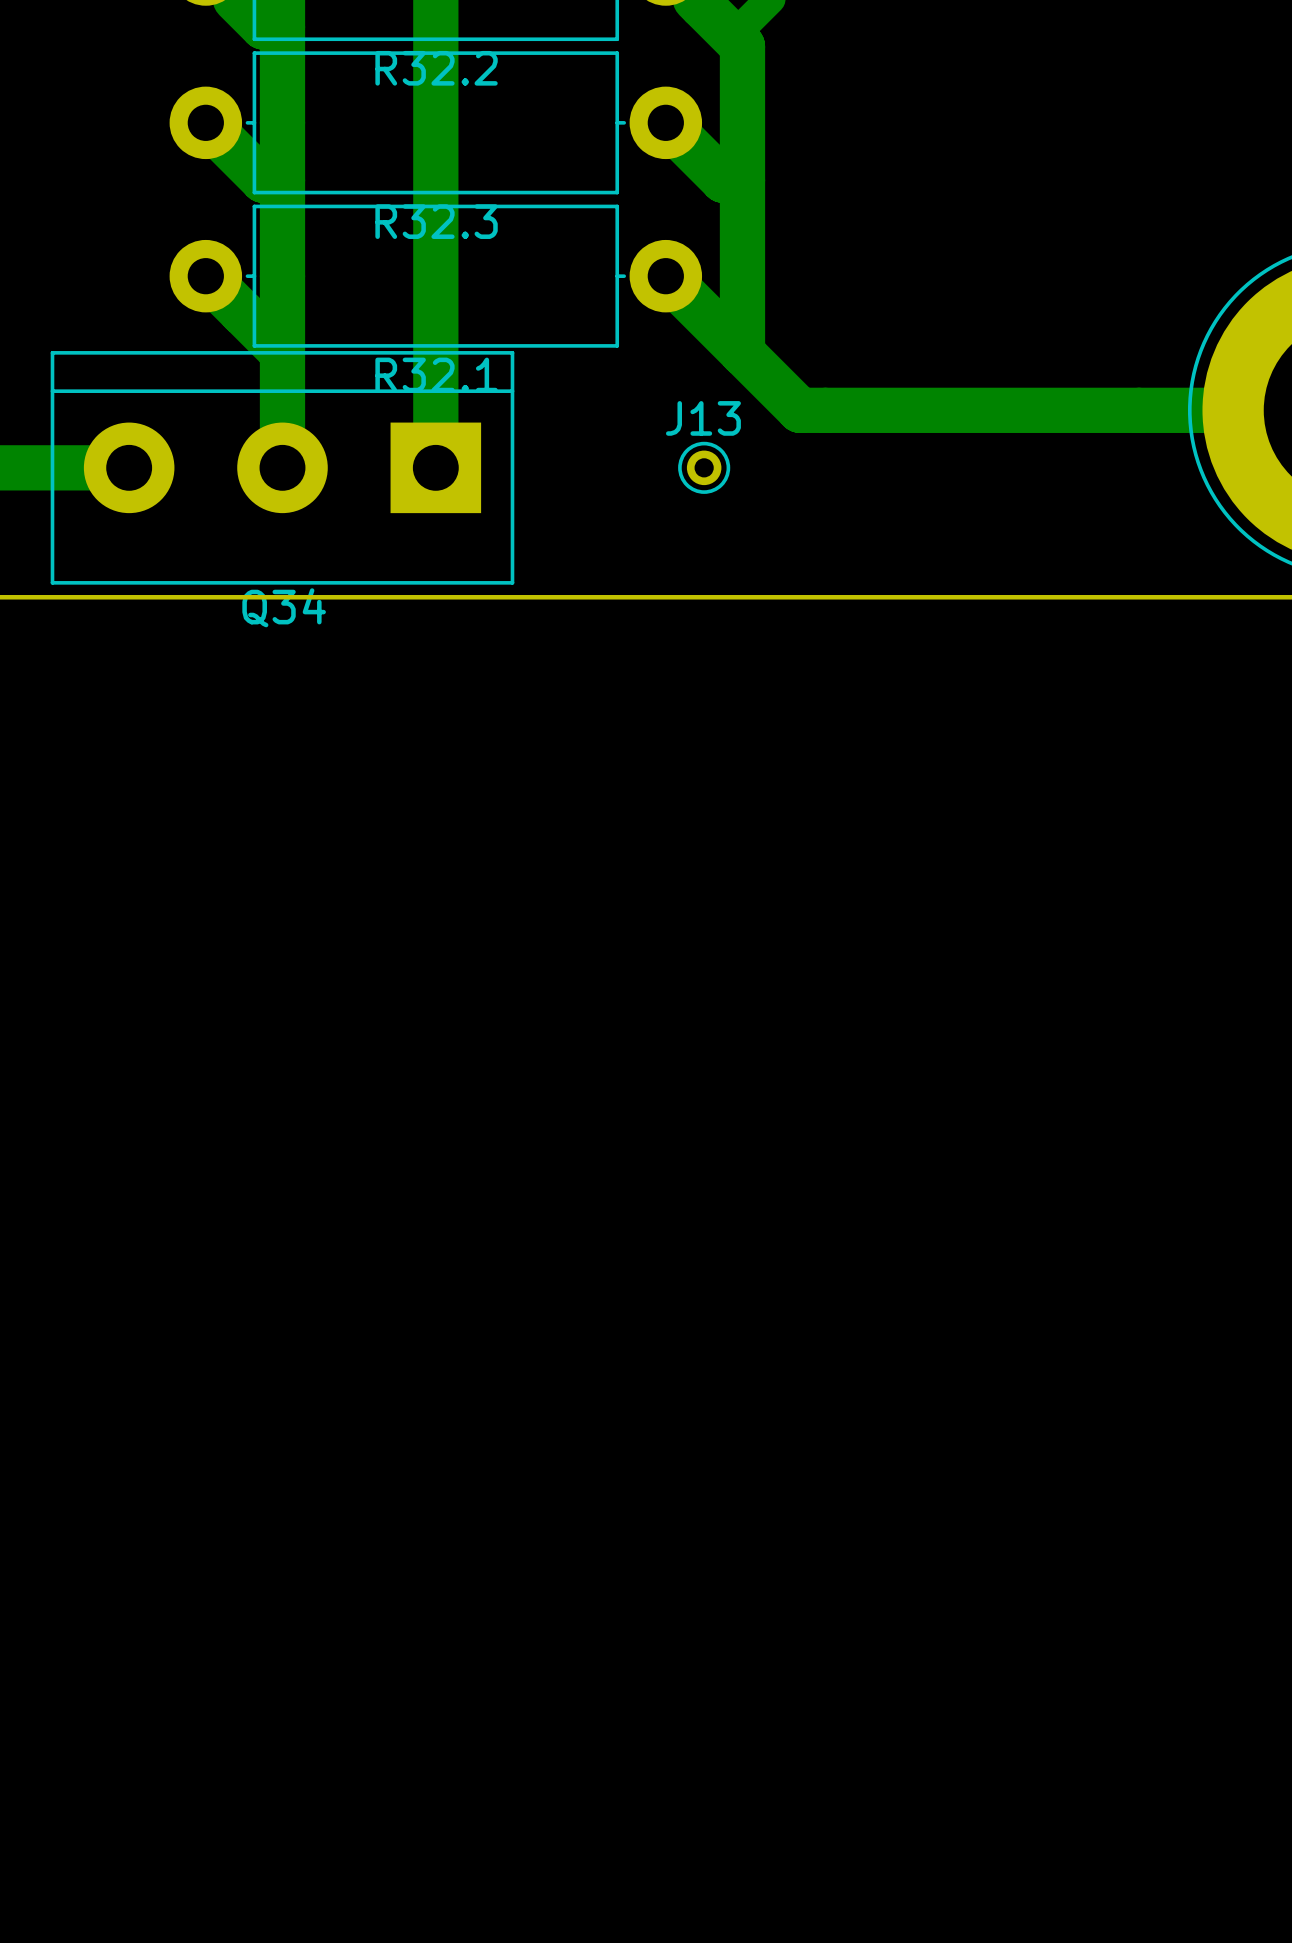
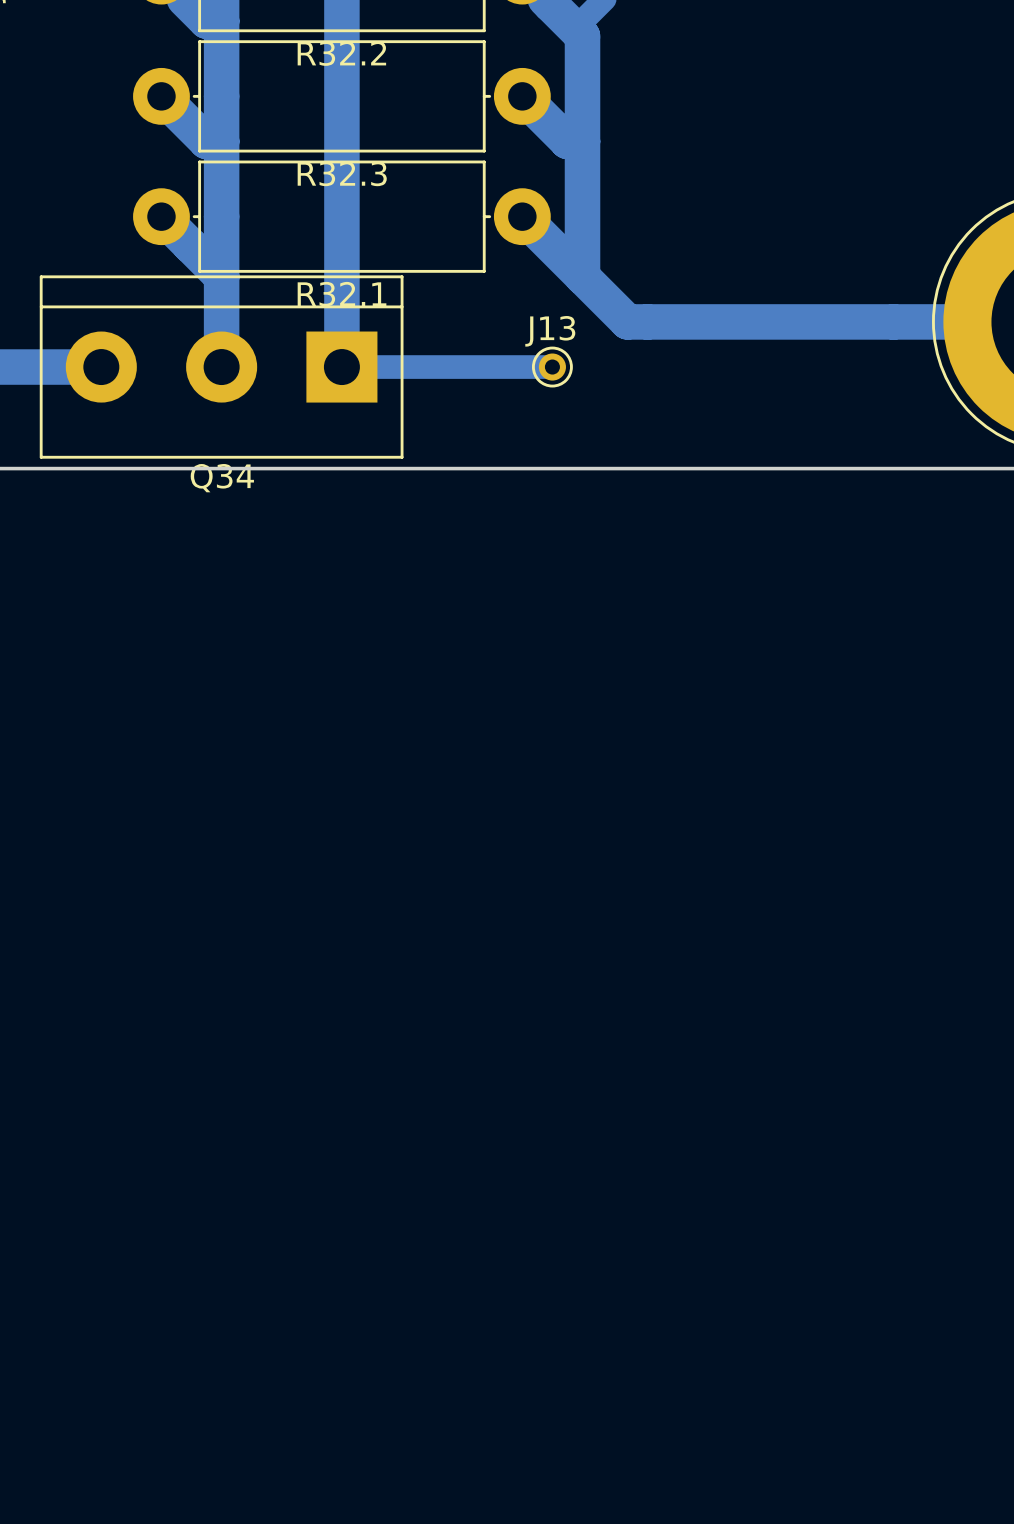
bottom track: none -> (341, 367) (552, 367)

